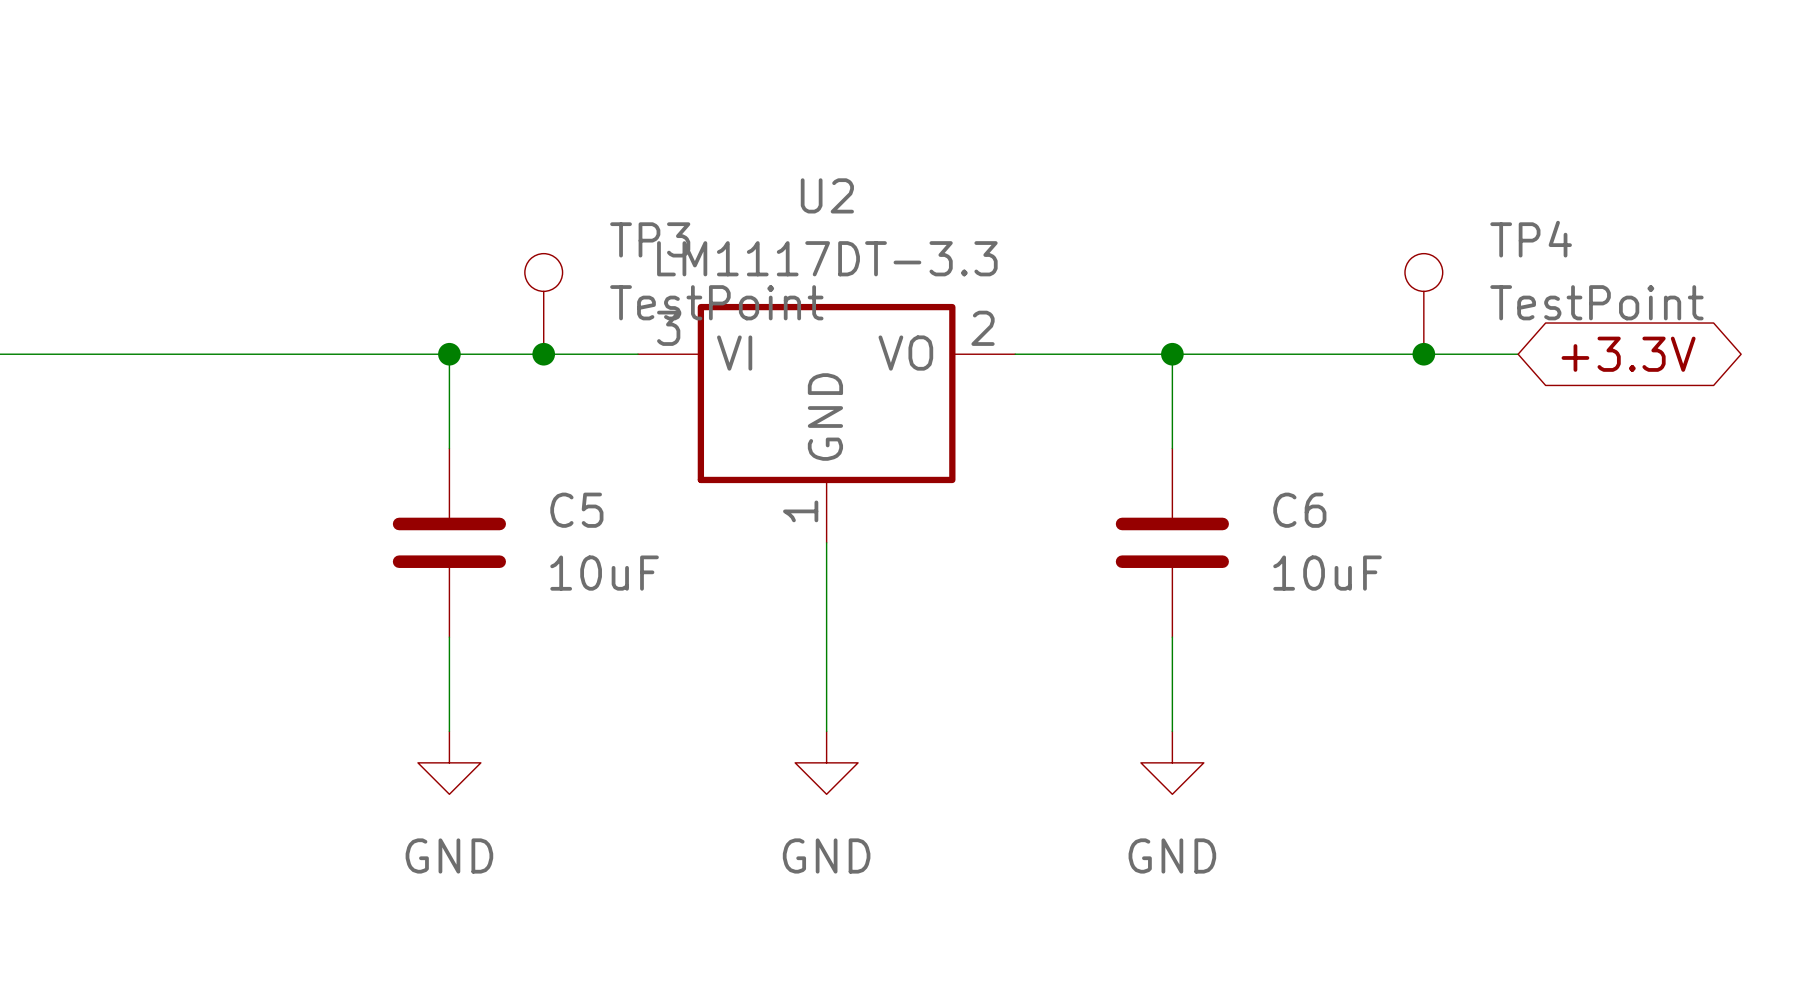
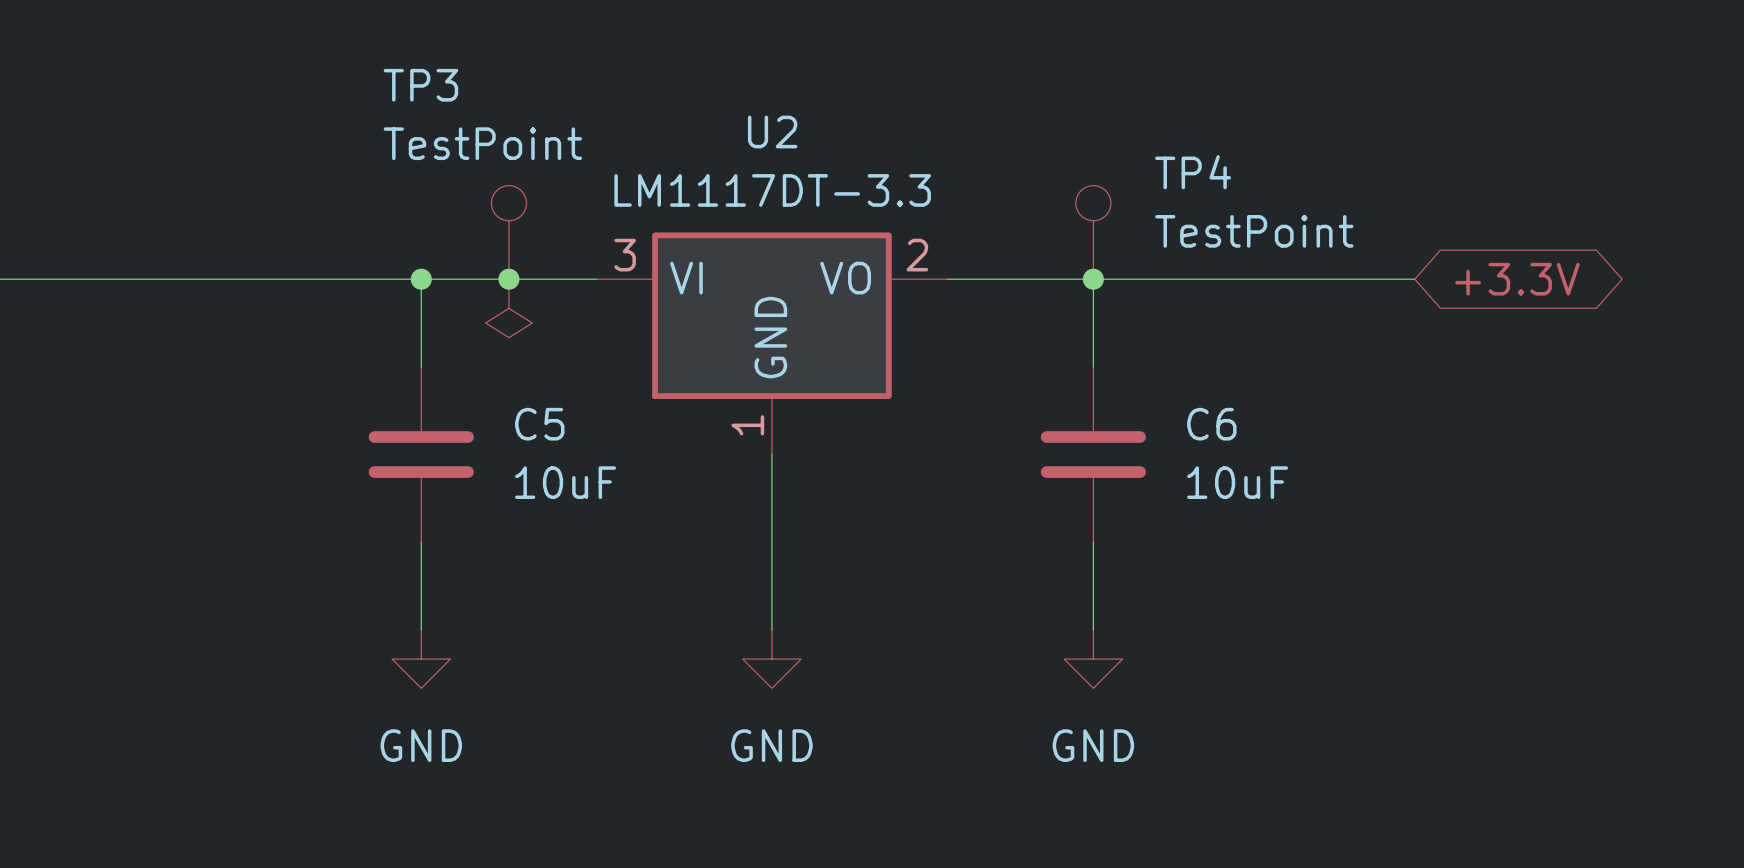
TP3 name position: TP3 (650, 239) -> TP3 (420, 85)
TP3 value position: TestPoint (716, 302) -> TestPoint (482, 143)
TP4 position: (1423, 303) -> (1093, 232)
junction: (1423, 354) -> none
power symbol: none -> (508, 308)

